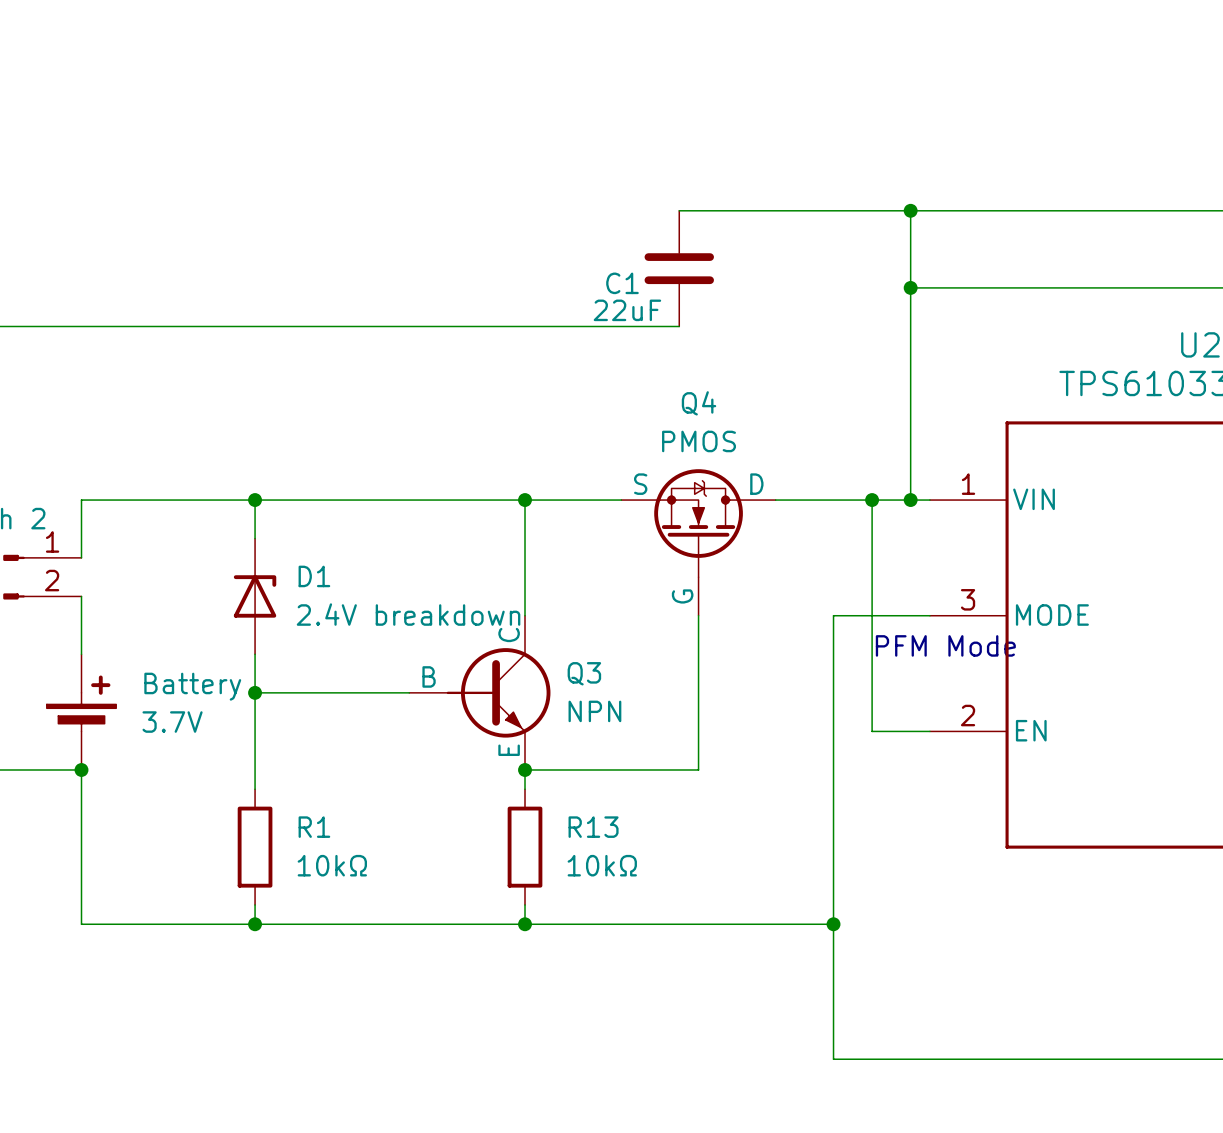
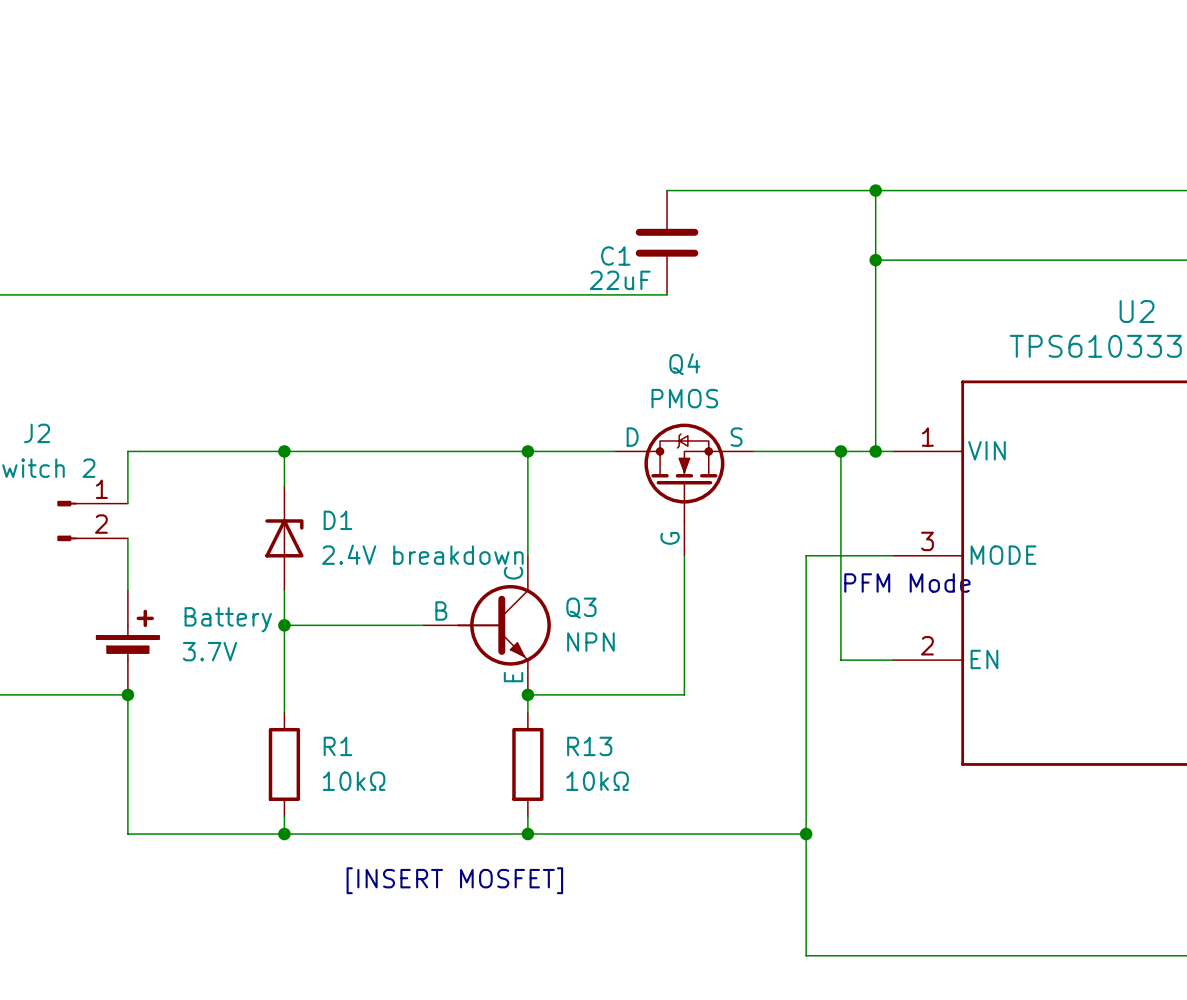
Q4 flip: as is (698, 523) -> left-right (684, 472)
text: none -> [INSERT MOSFET] (454, 880)

